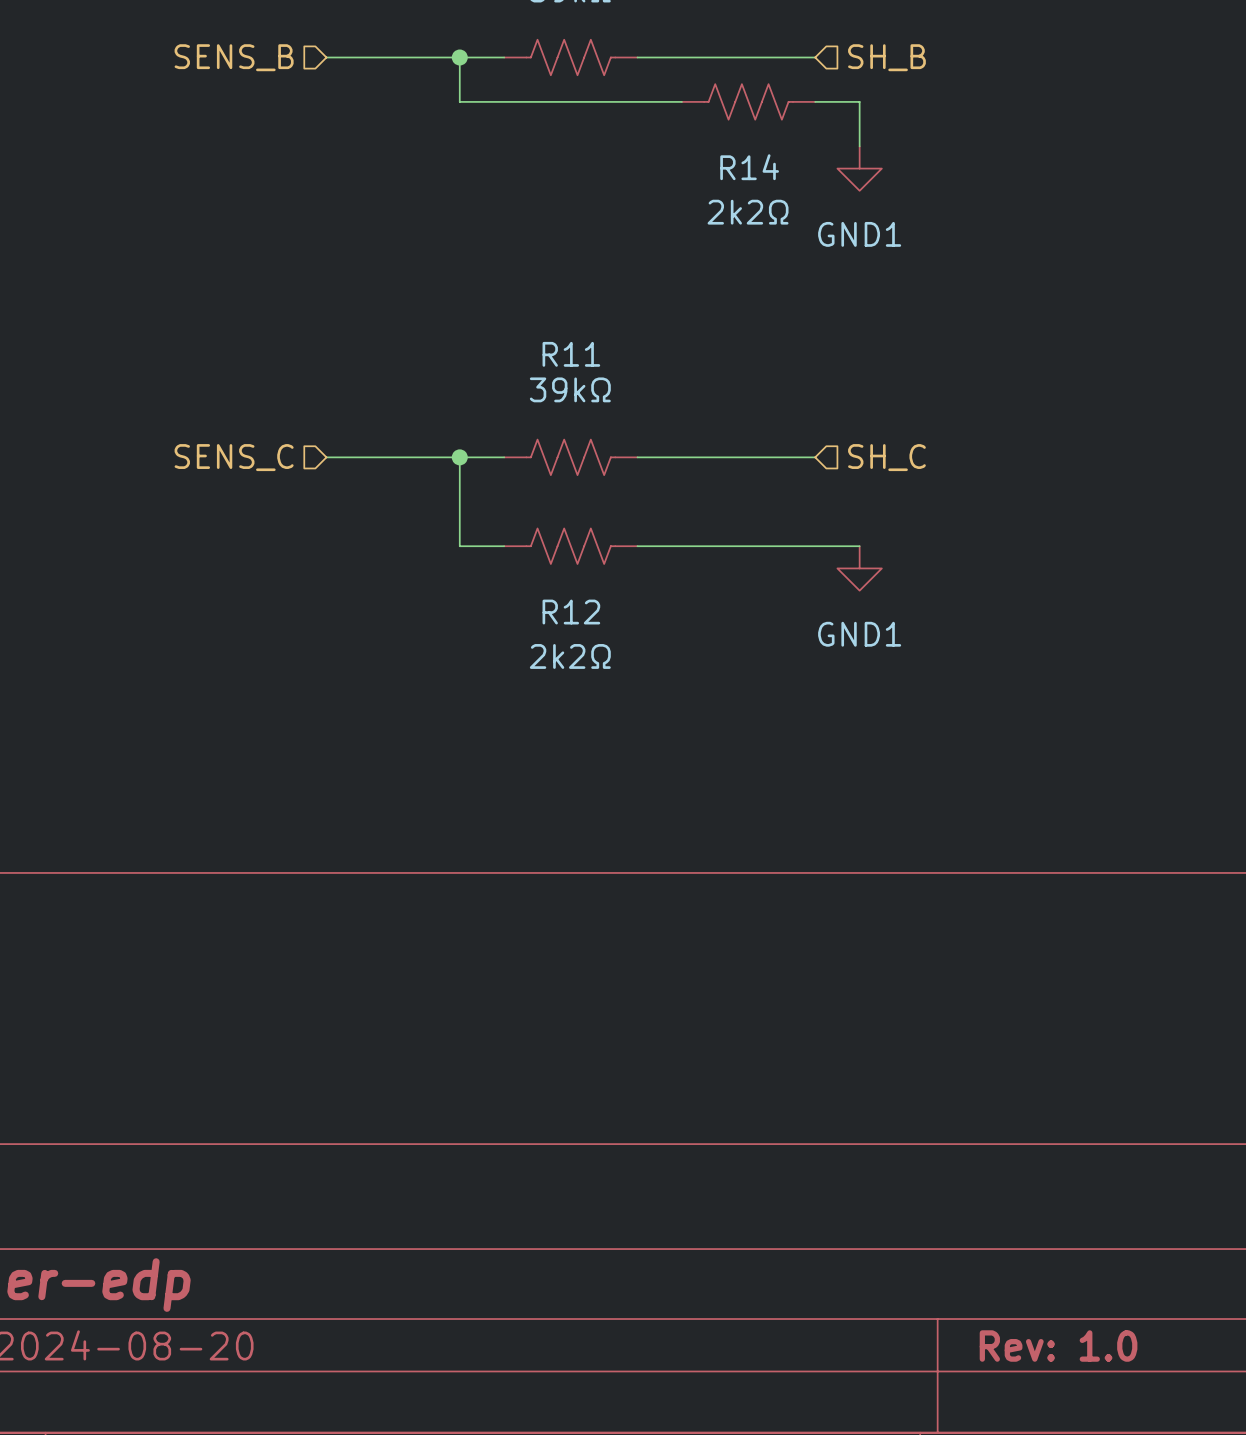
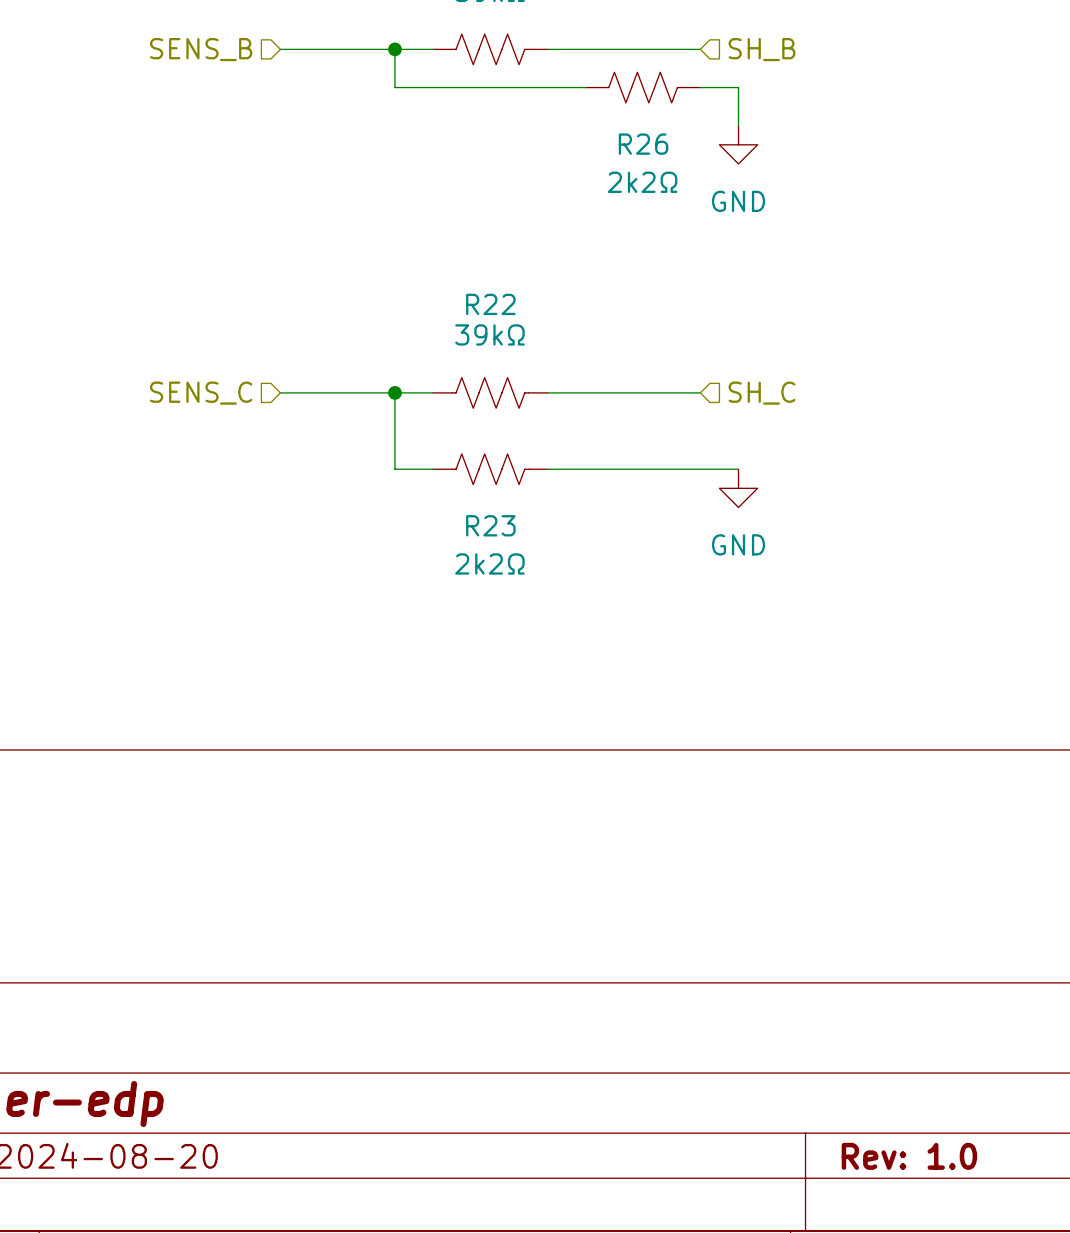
R14 name: R14 (749, 167) -> R26 (643, 144)
power symbol: GND1 (859, 168) -> GND (738, 144)
R11 name: R11 (571, 354) -> R22 (490, 304)
power symbol: GND1 (859, 568) -> GND (738, 488)
R12 name: R12 (571, 612) -> R23 (490, 525)

